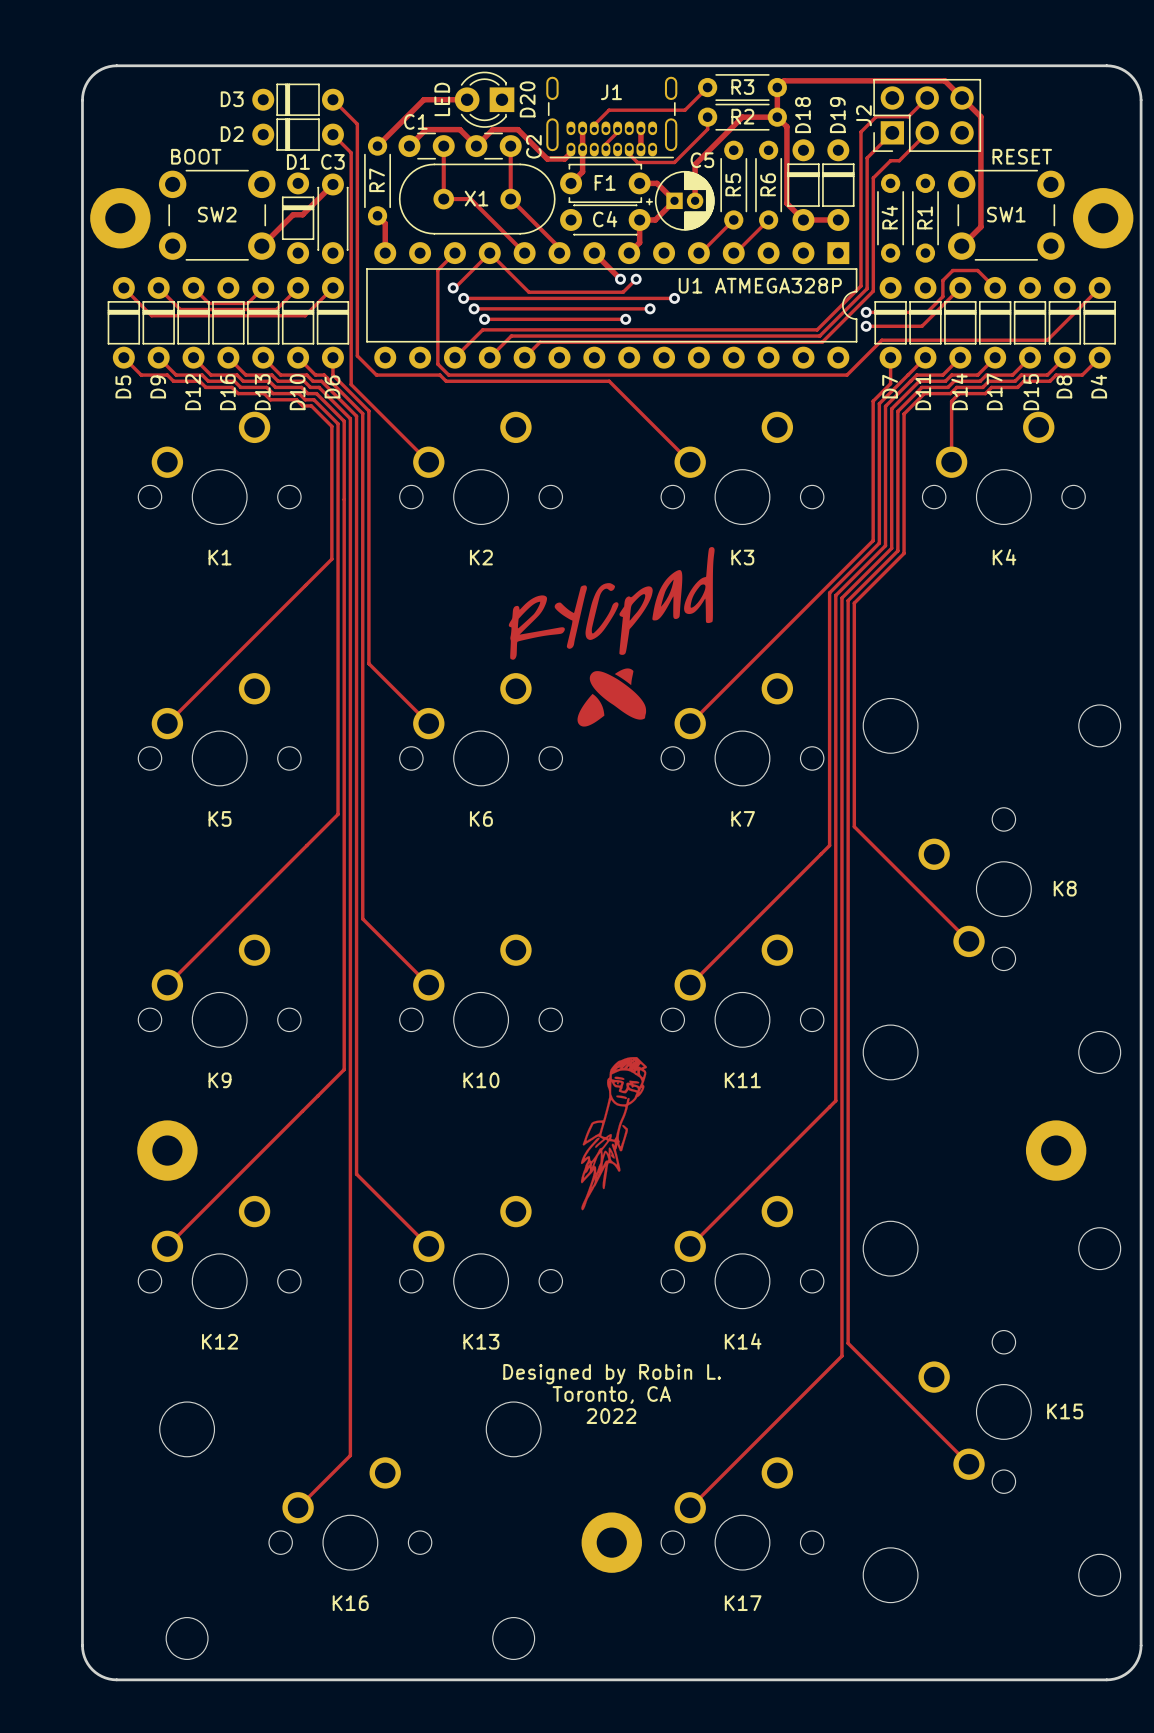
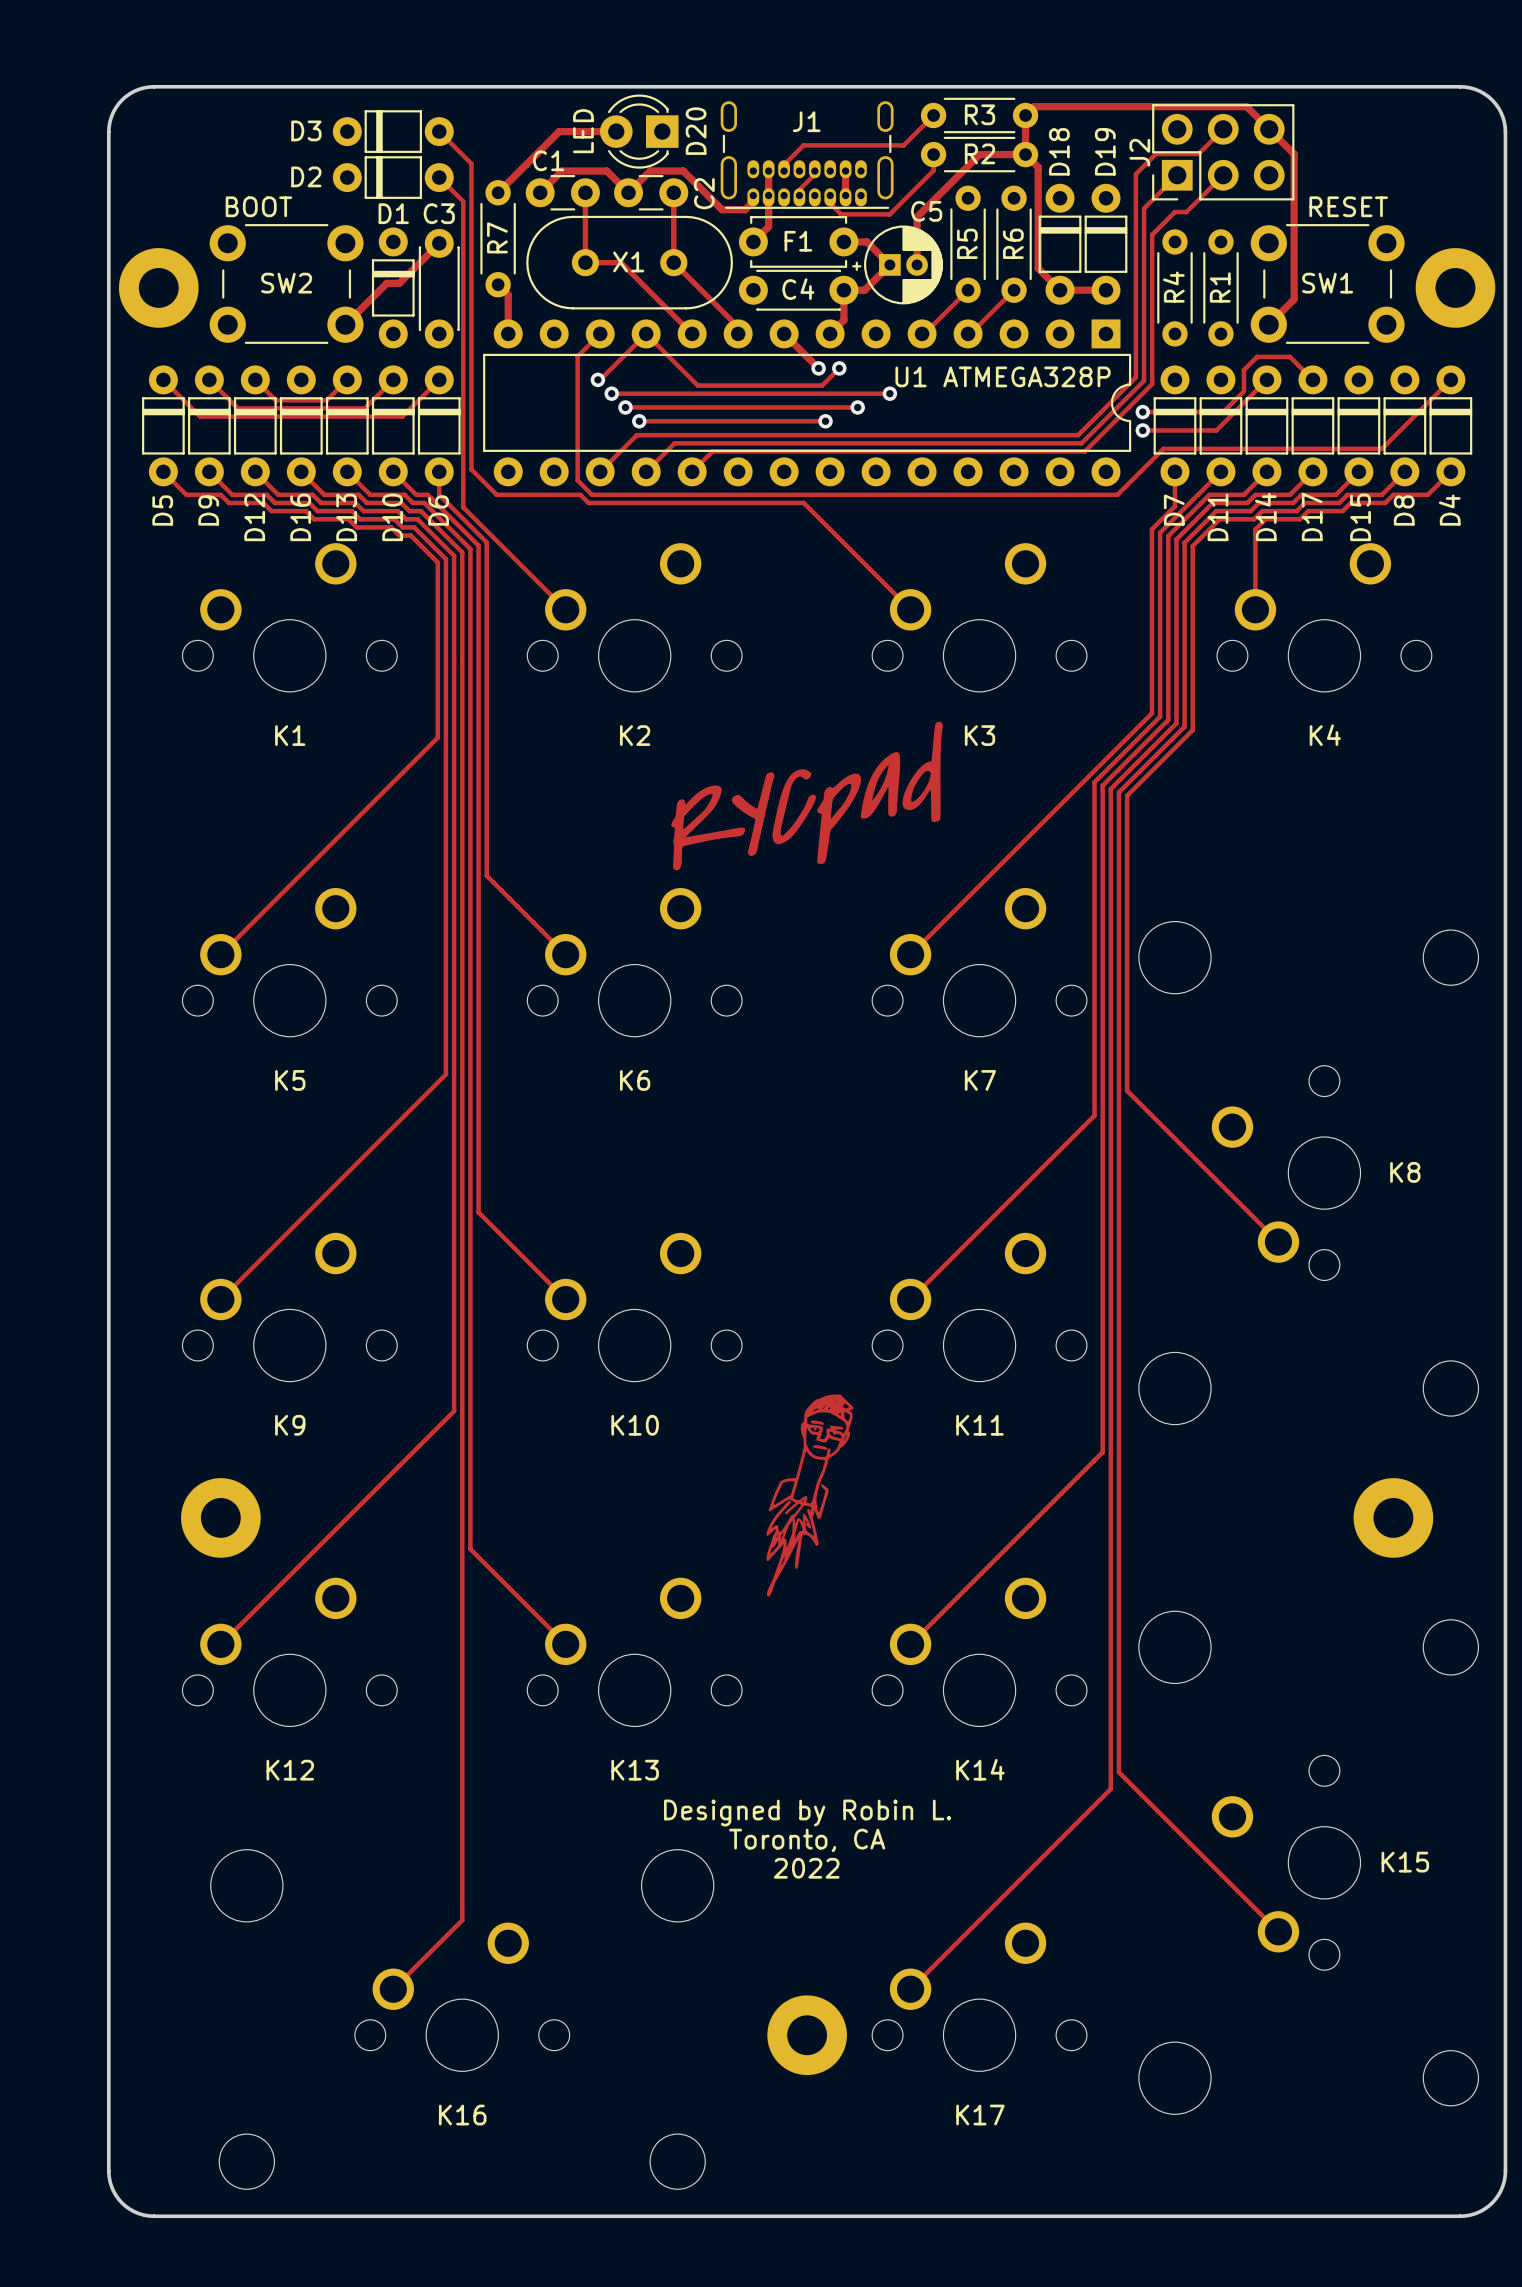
drawing: [577, 668, 647, 727] -> none

